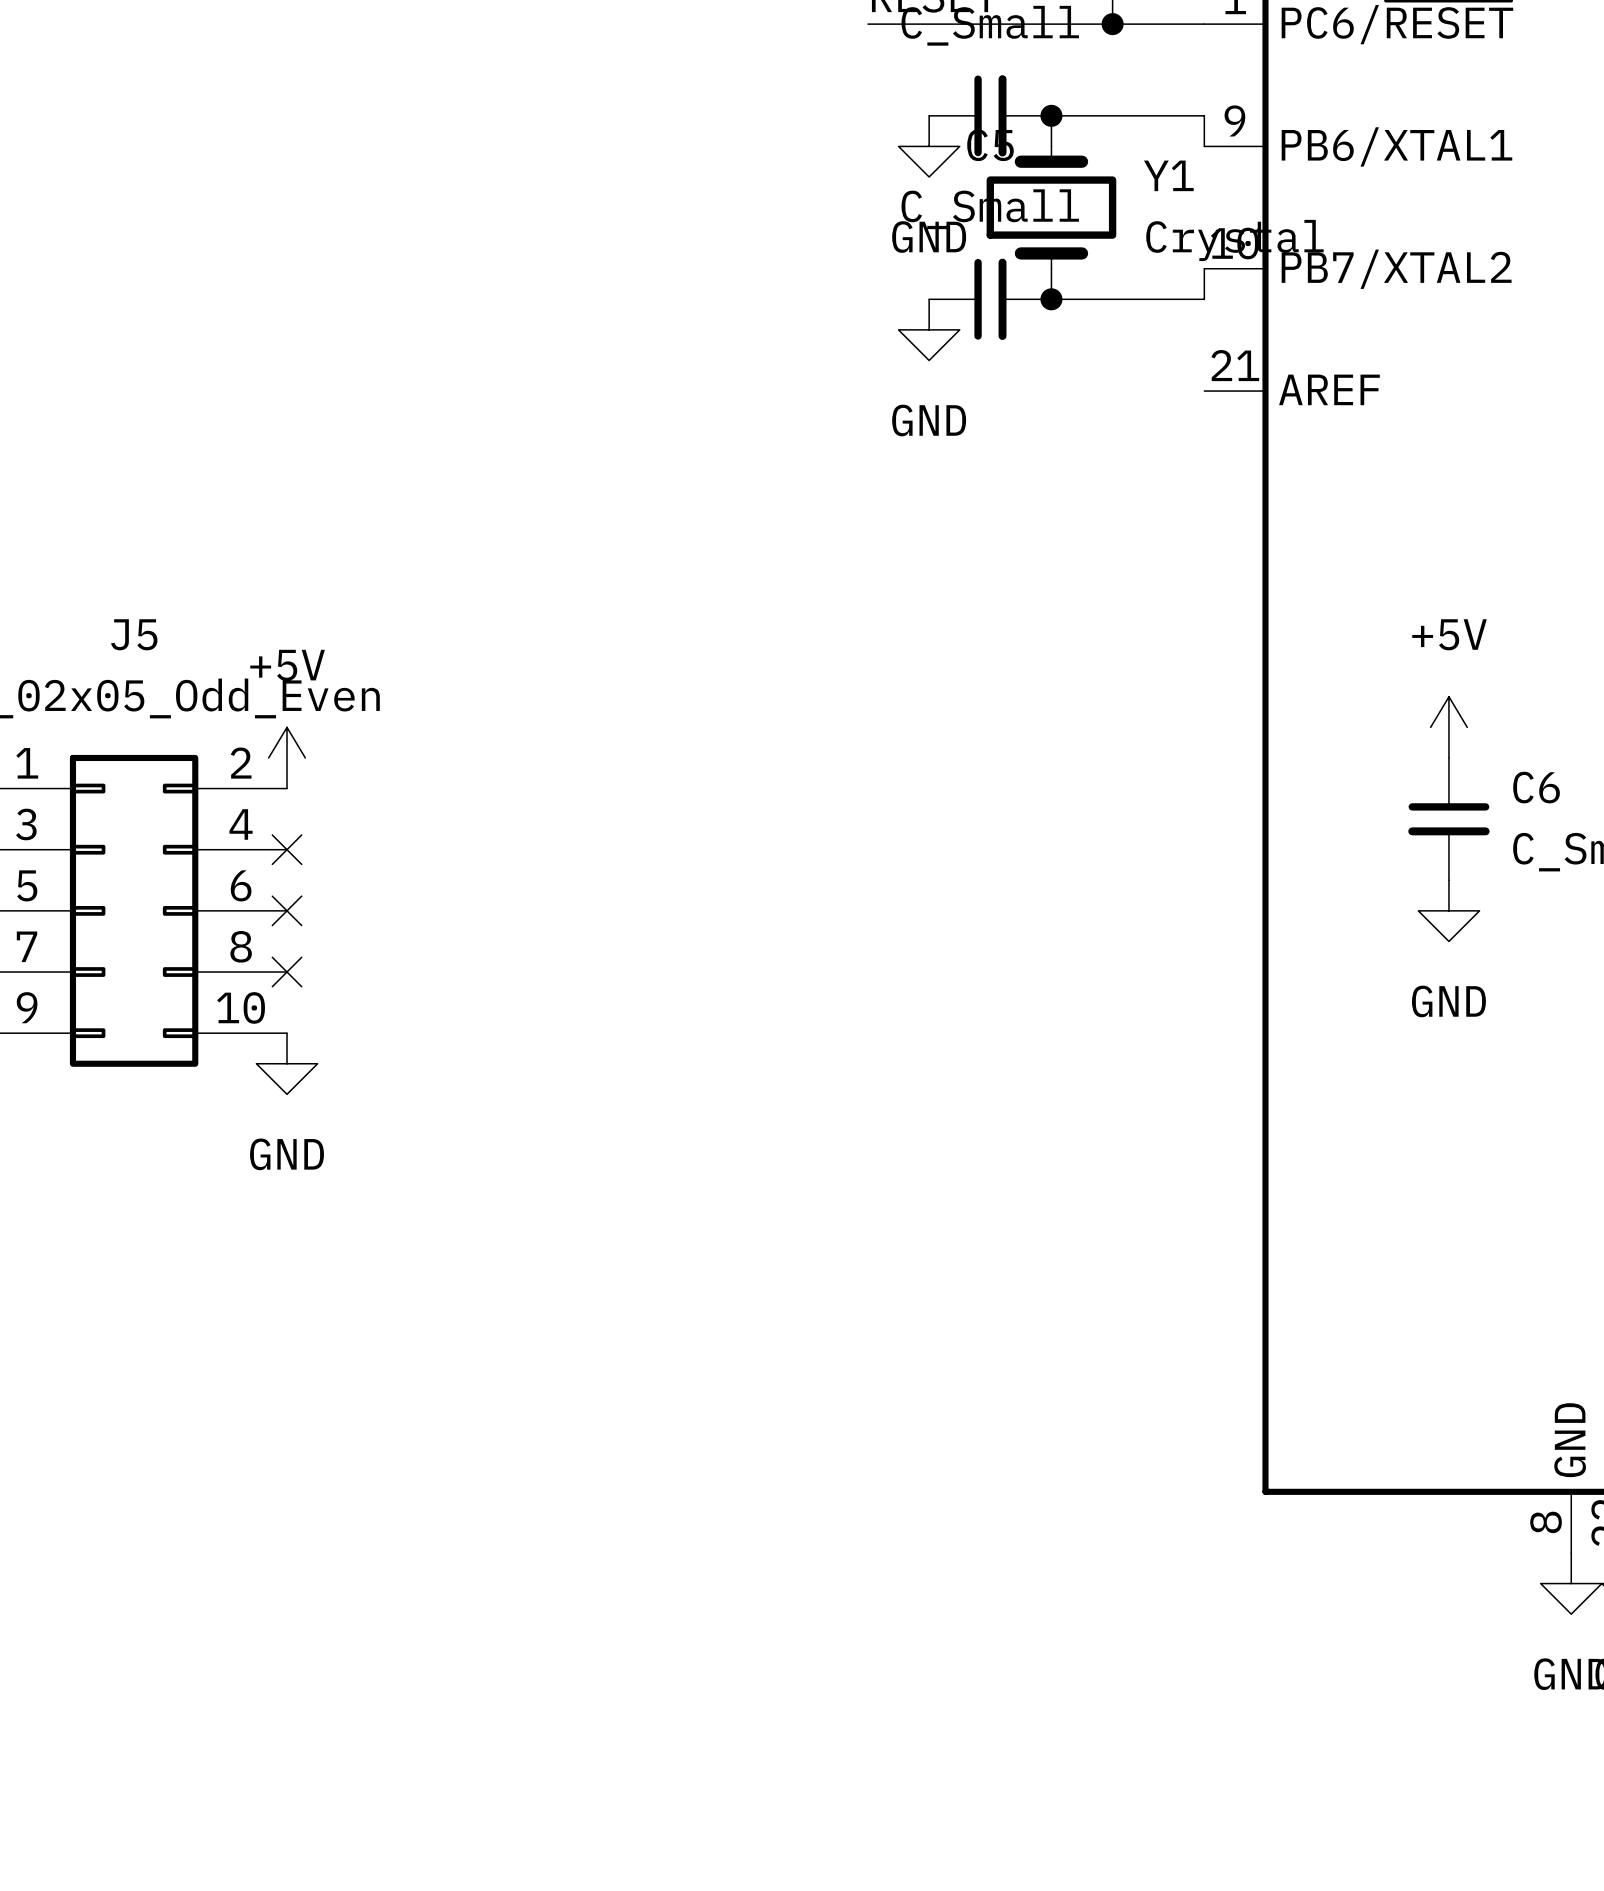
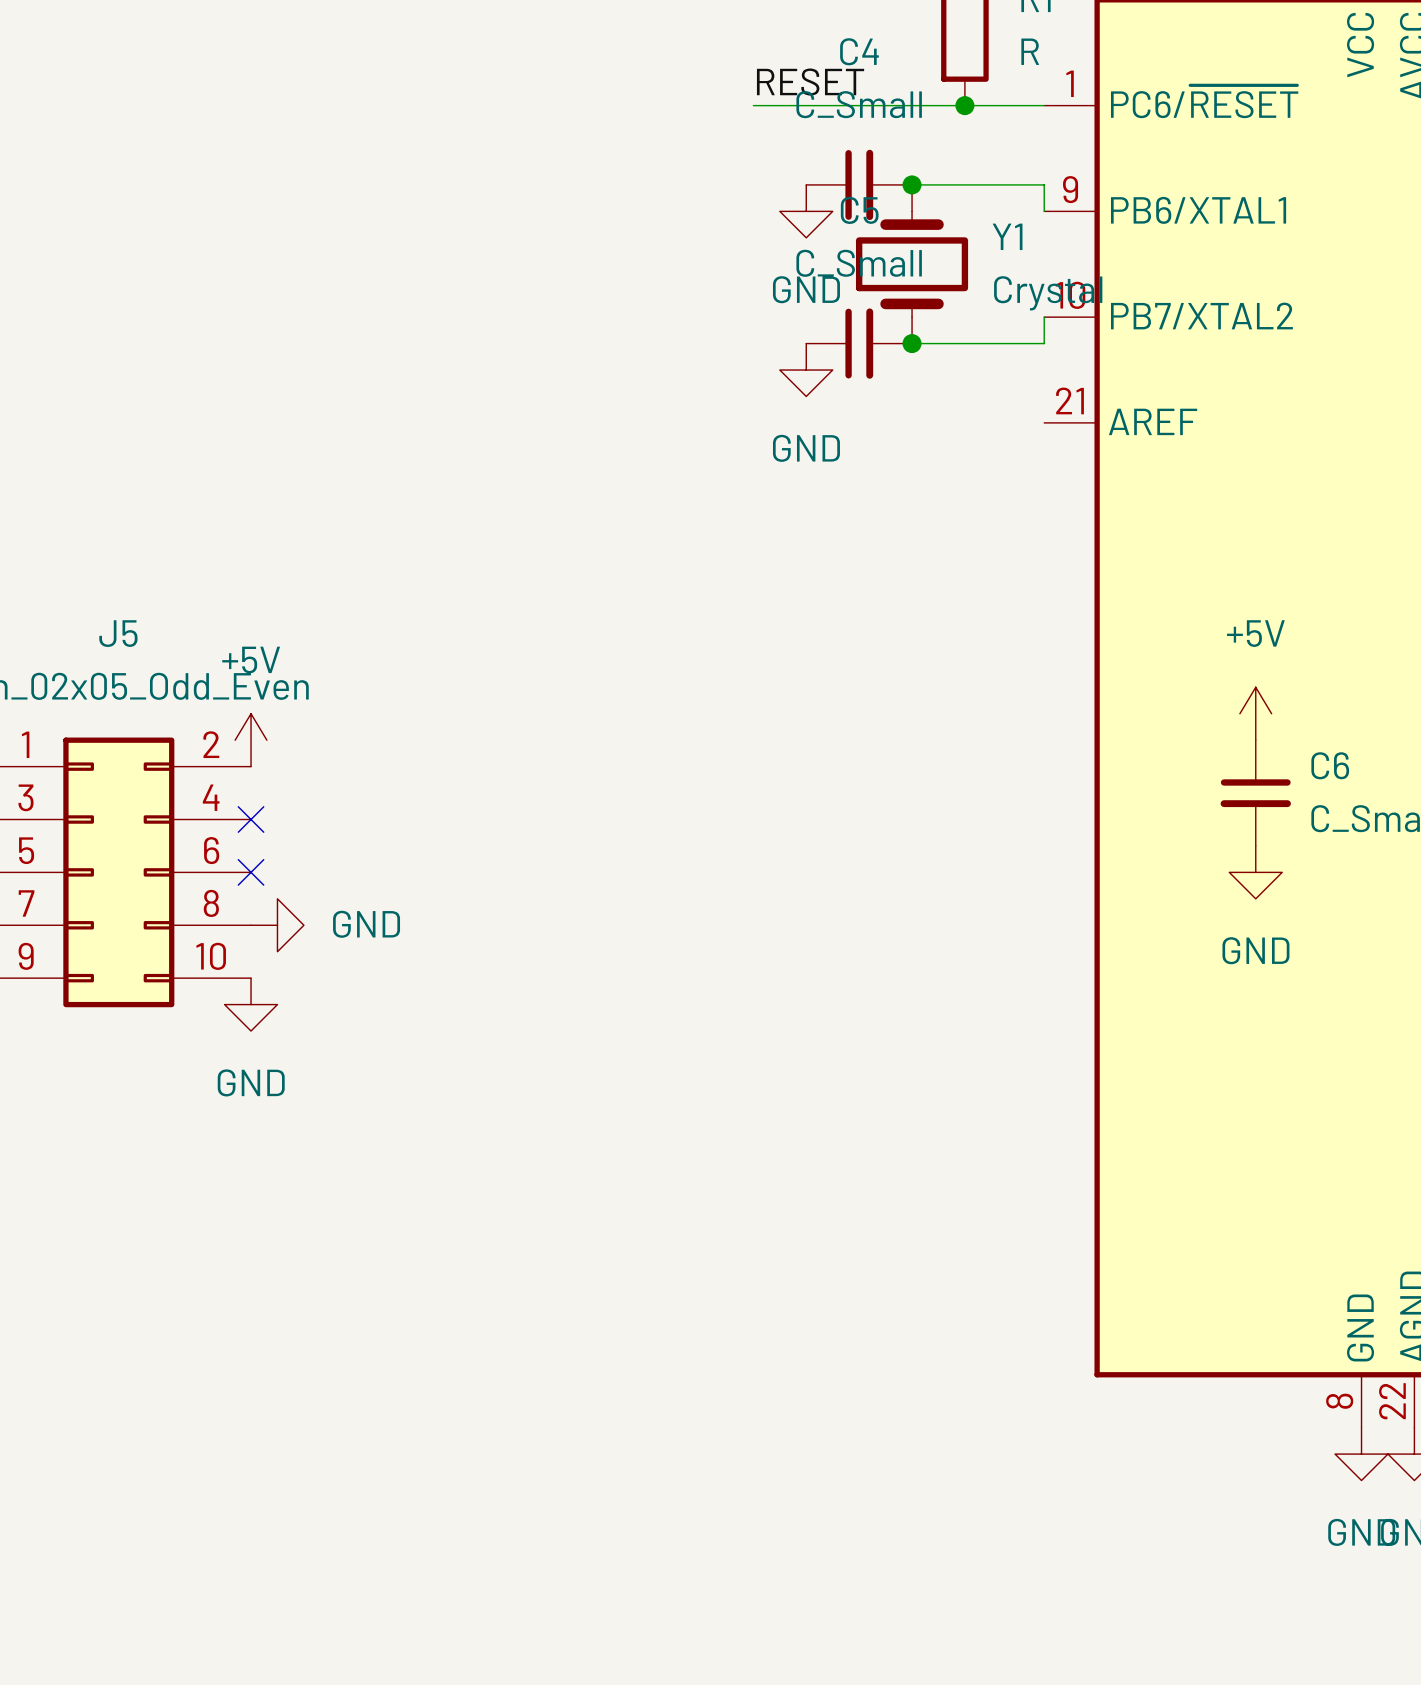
no-connect mark: (287, 972) -> none
power symbol: none -> GND (277, 925)

